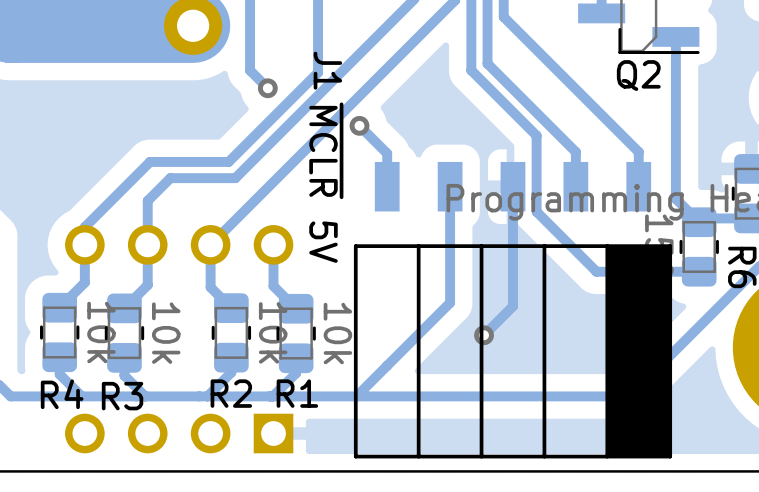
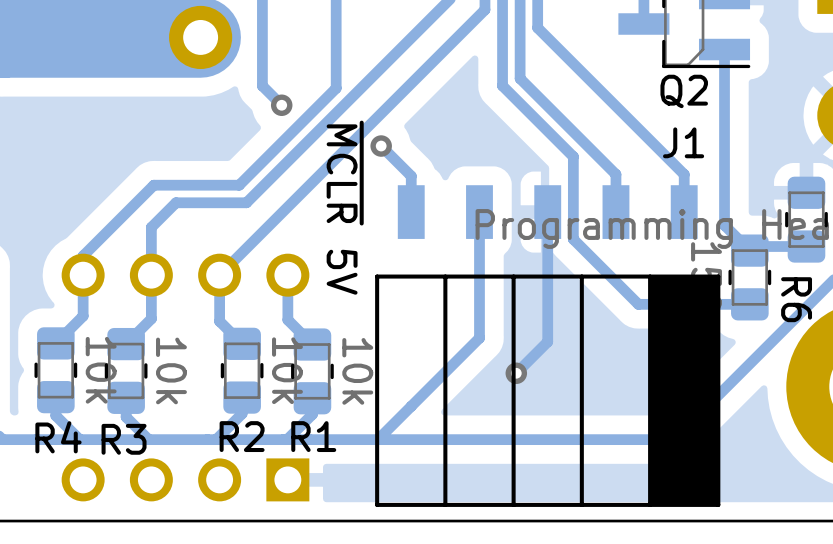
J1 name rotation: 0° (327, 70) -> 90° counterclockwise (683, 142)
J1 name position: J1 (327, 70) -> J1 (683, 142)

